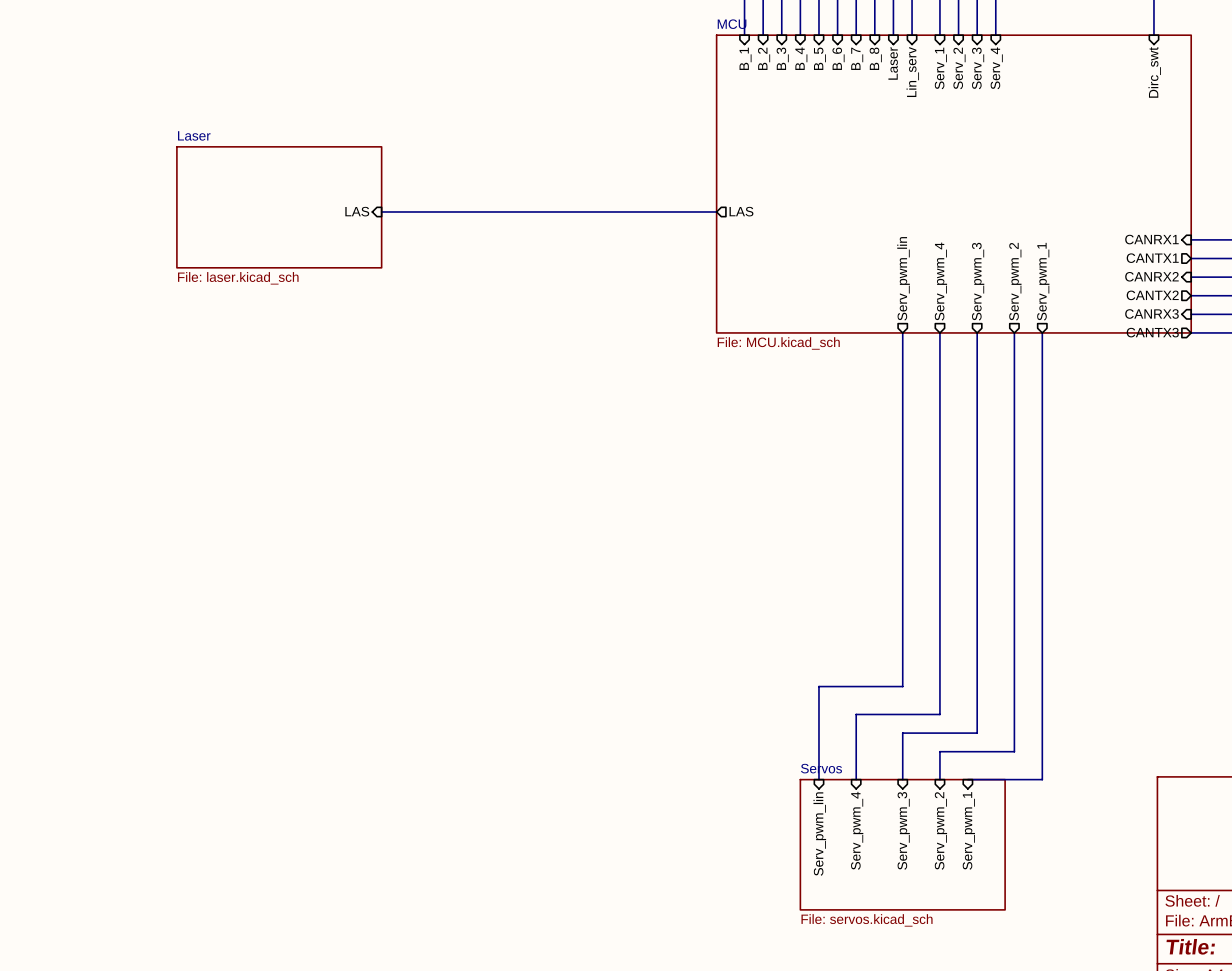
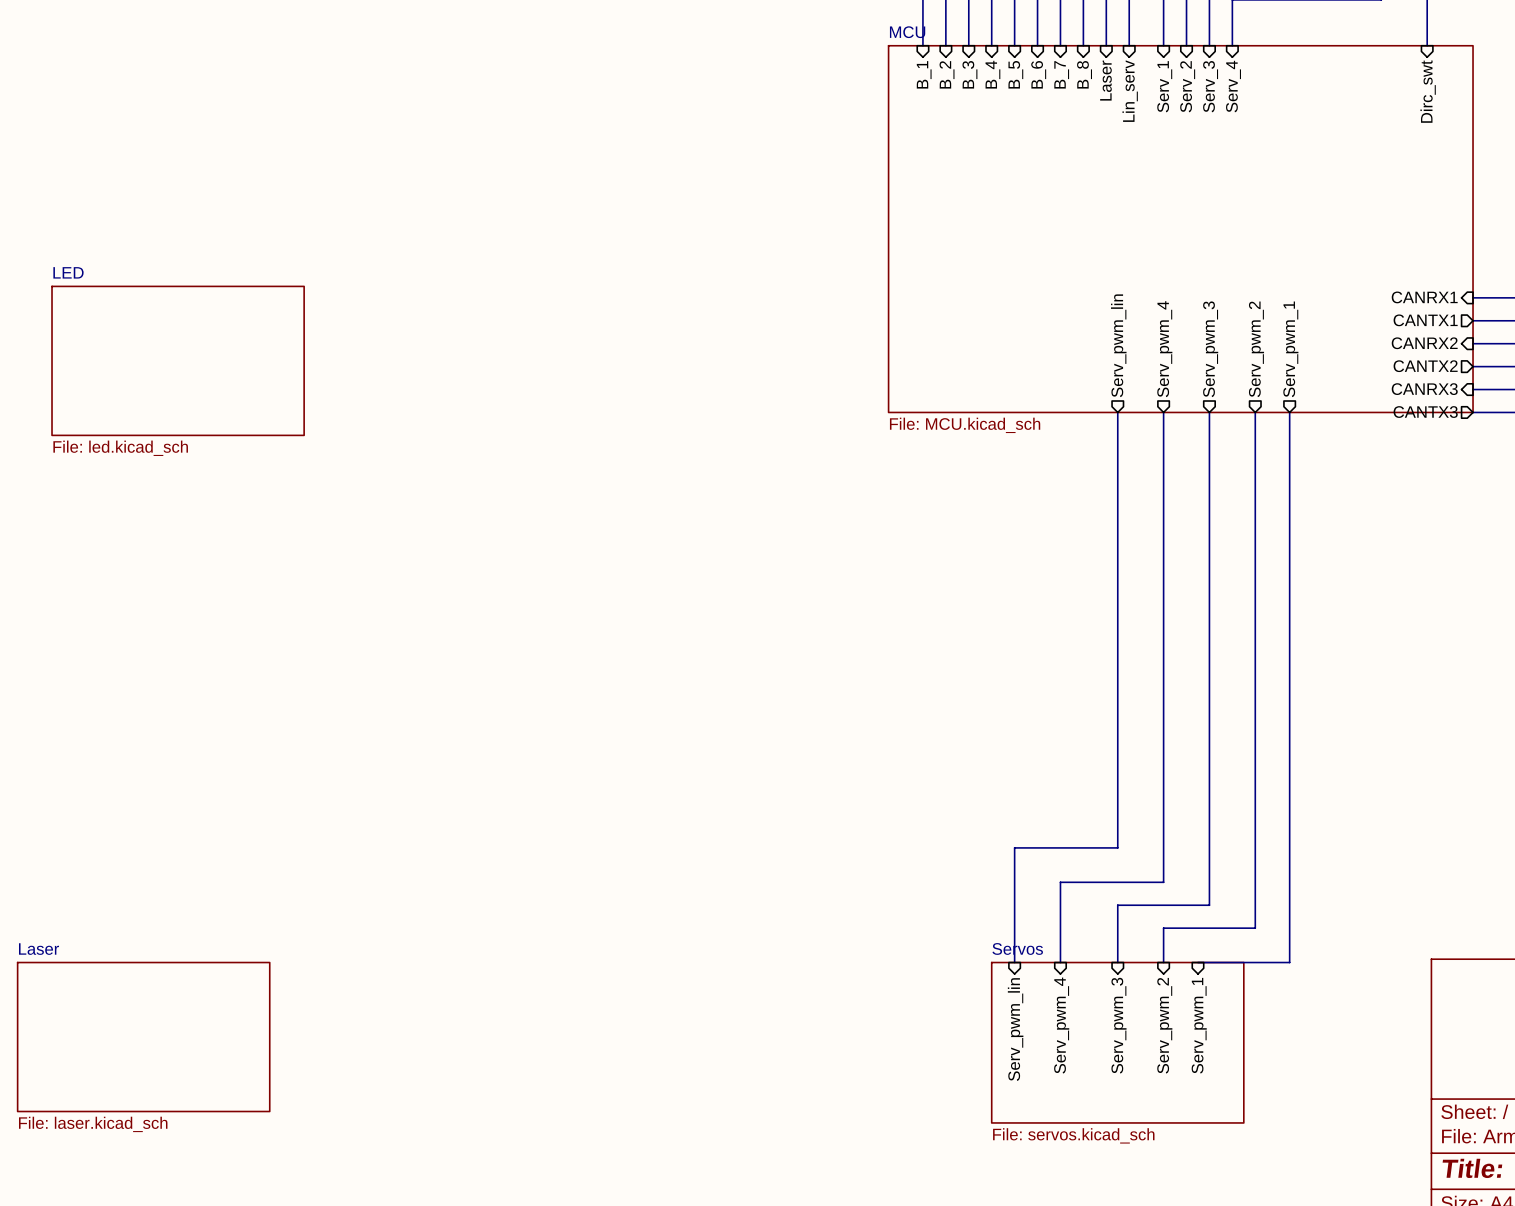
sheet Laser: File: laser.kicad_sch (279, 207) -> none
sheet pin: LAS (357, 211) -> none
wire: (381, 211) (716, 211) -> none
sheet pin: LAS (741, 211) -> none
sheet LED: none -> File: led.kicad_sch (178, 360)
sheet Laser: none -> File: laser.kicad_sch (143, 1037)

